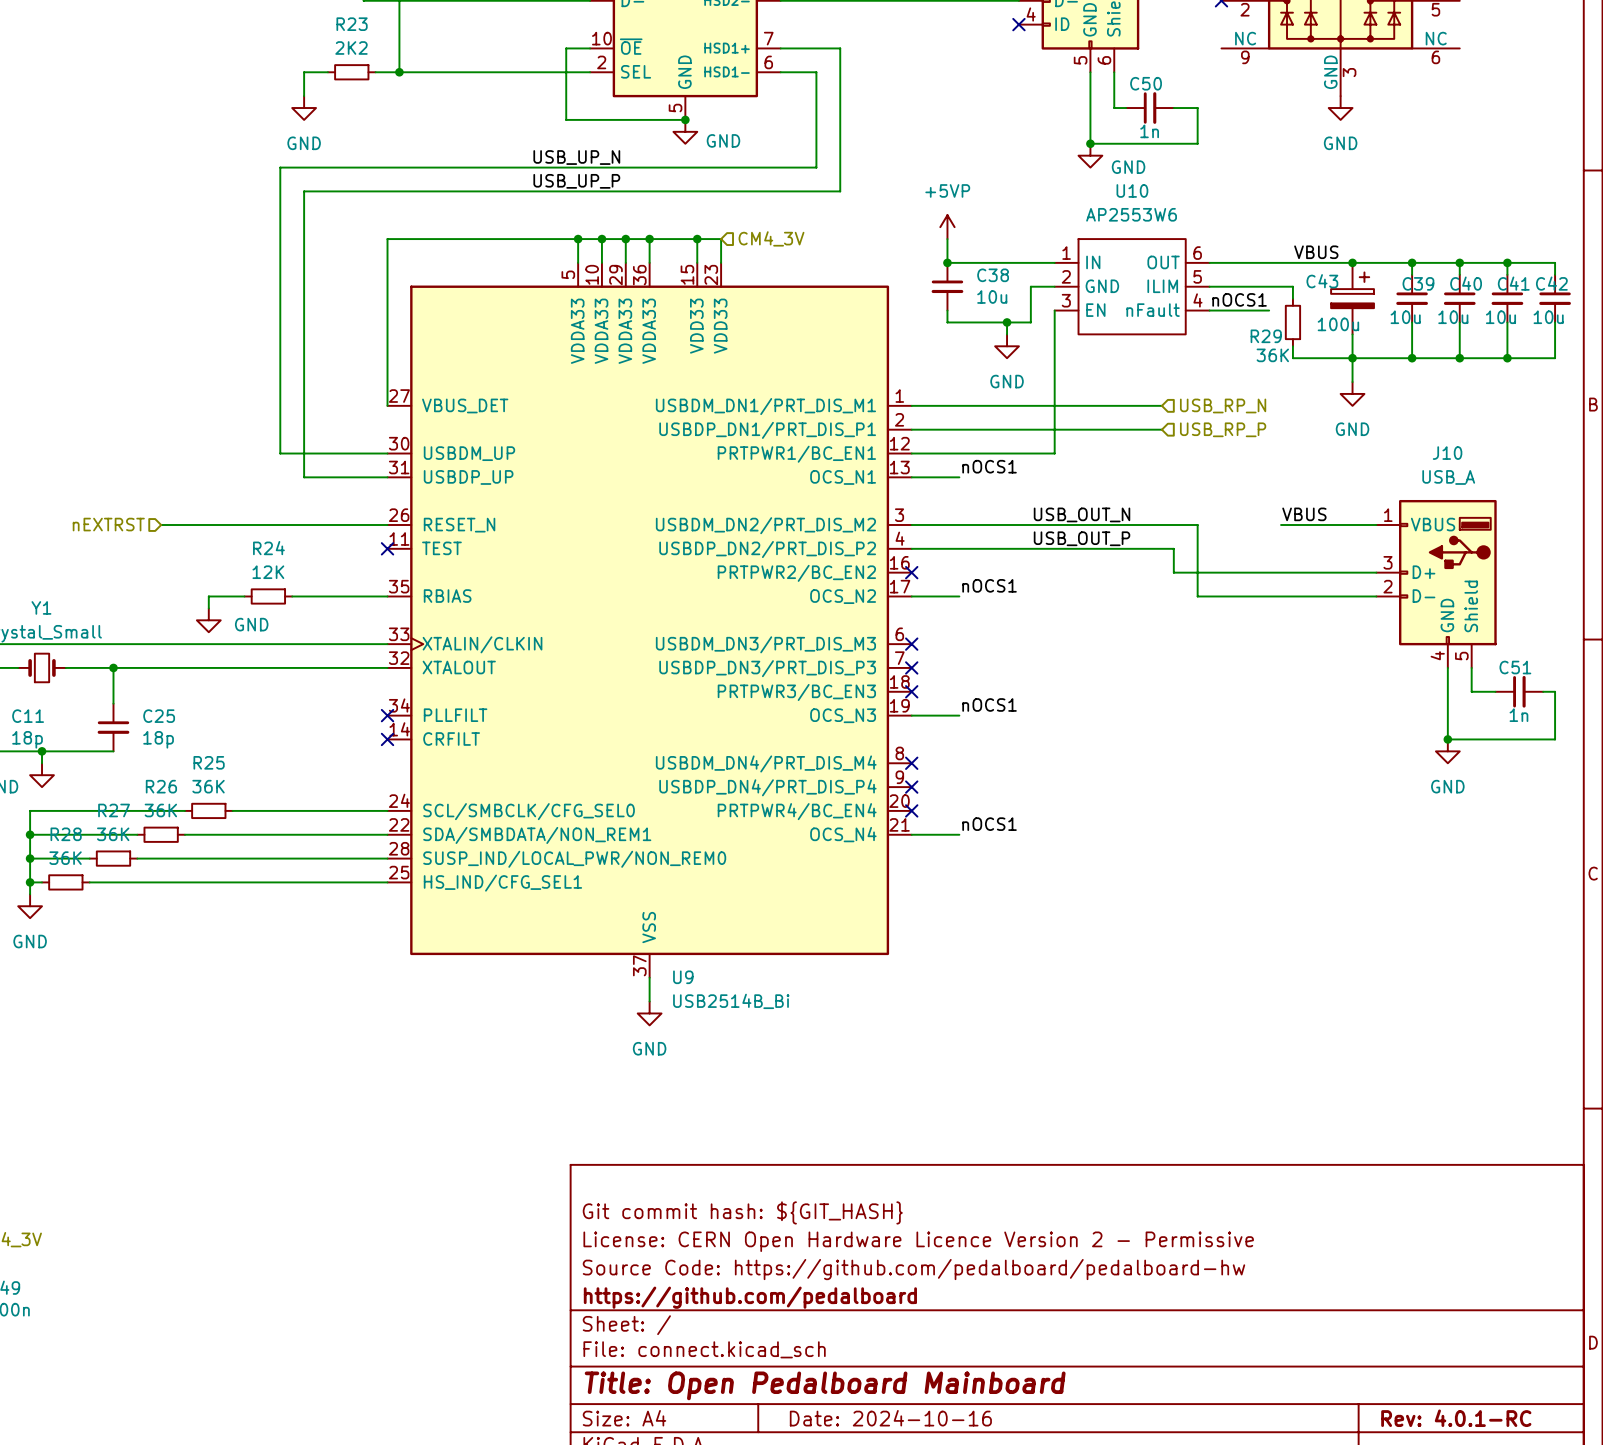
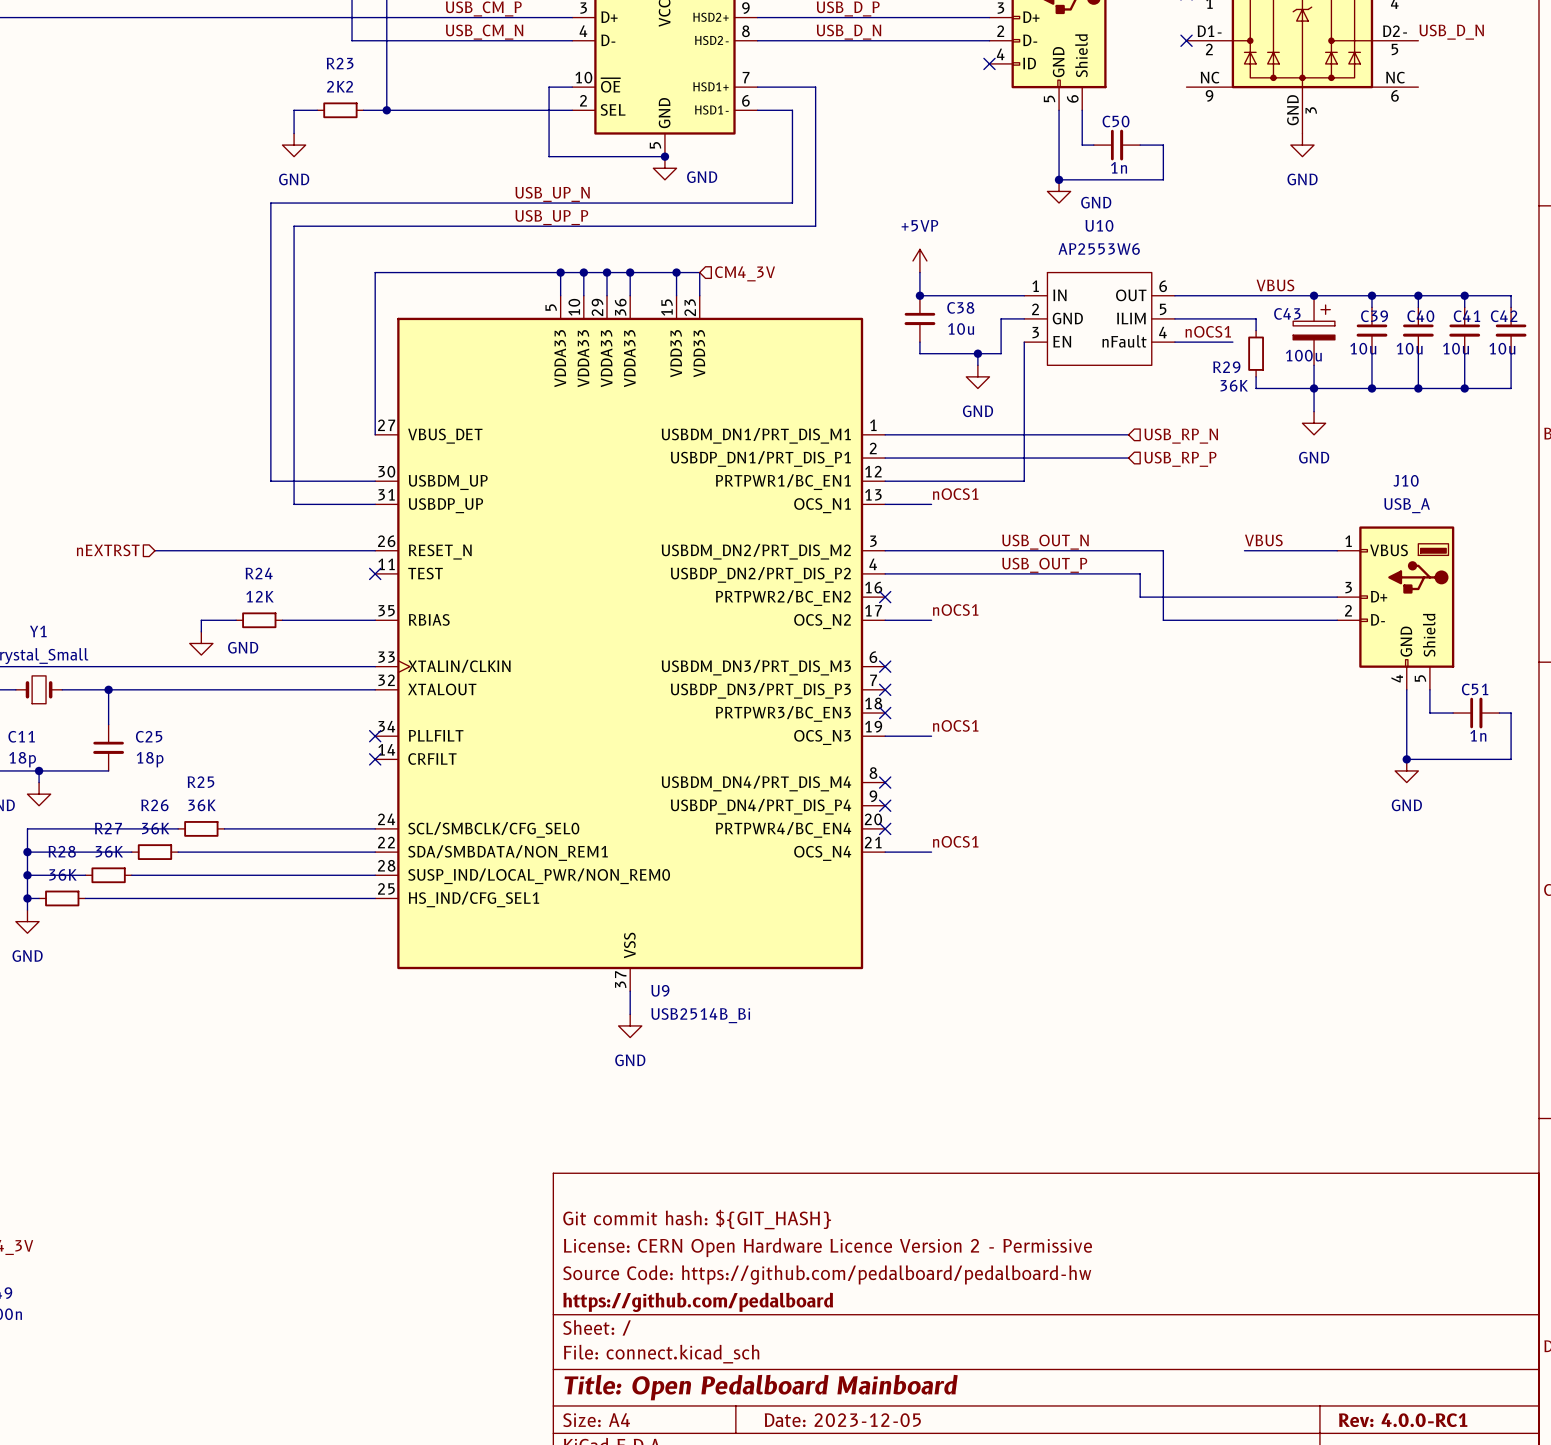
title block: Date: 2024-10-16 (890, 1418) -> Date: 2023-12-05 (842, 1420)
title block: Rev: 4.0.1-RC (1456, 1418) -> Rev: 4.0.0-RC1 (1403, 1420)

